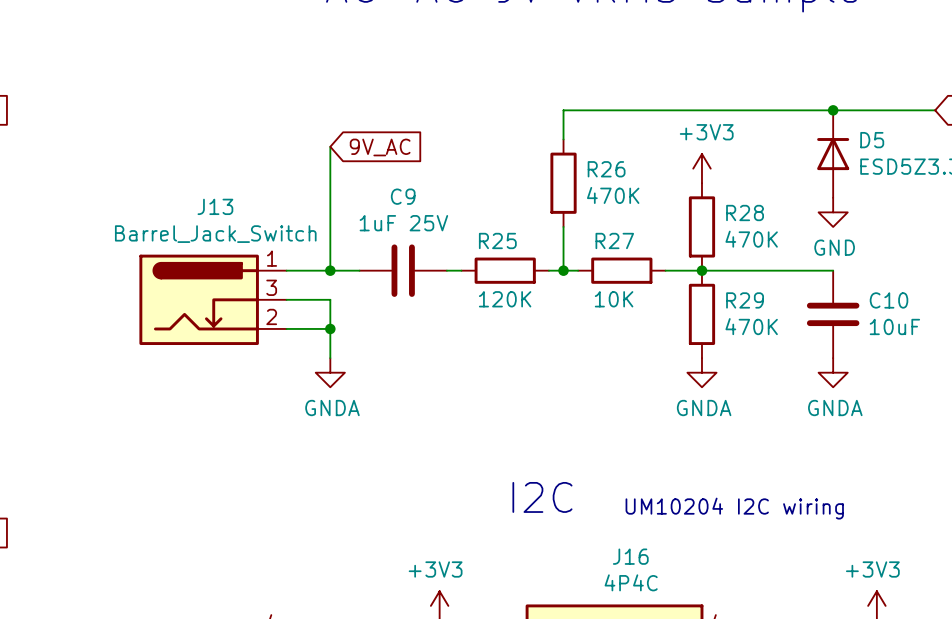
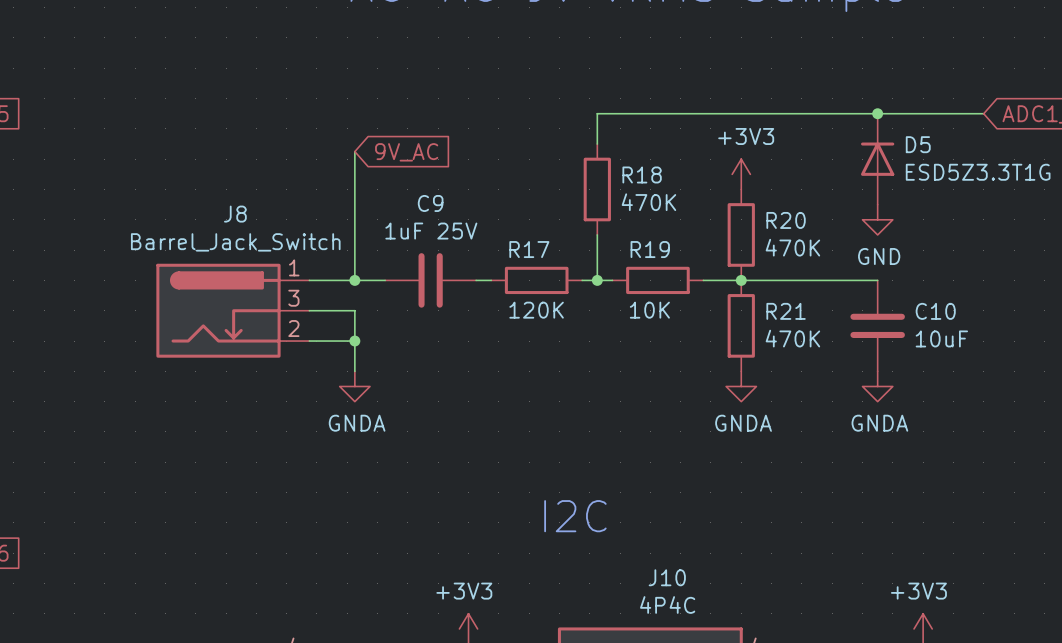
R26 name: R26 (606, 169) -> R18 (642, 174)
J13 name: J13 (215, 206) -> J8 (235, 214)
R28 name: R28 (745, 212) -> R20 (786, 220)
R25 name: R25 (497, 240) -> R17 (529, 249)
R27 name: R27 (614, 240) -> R19 (650, 249)
R29 name: R29 (745, 300) -> R21 (786, 311)
text: UM10204 I2C wiring (734, 508) -> none
J16 name: J16 (630, 556) -> J10 (667, 577)

